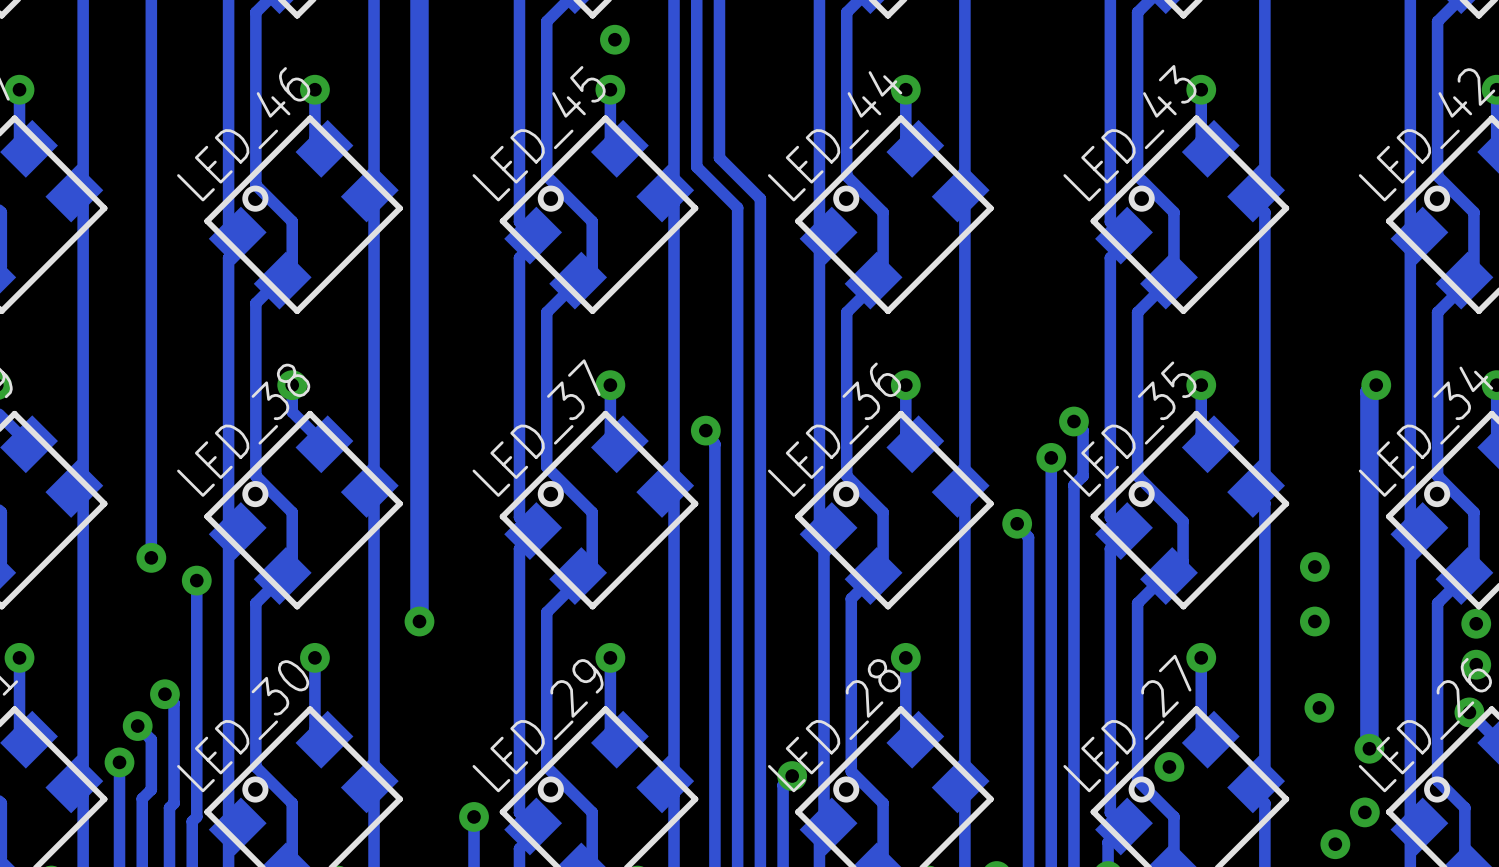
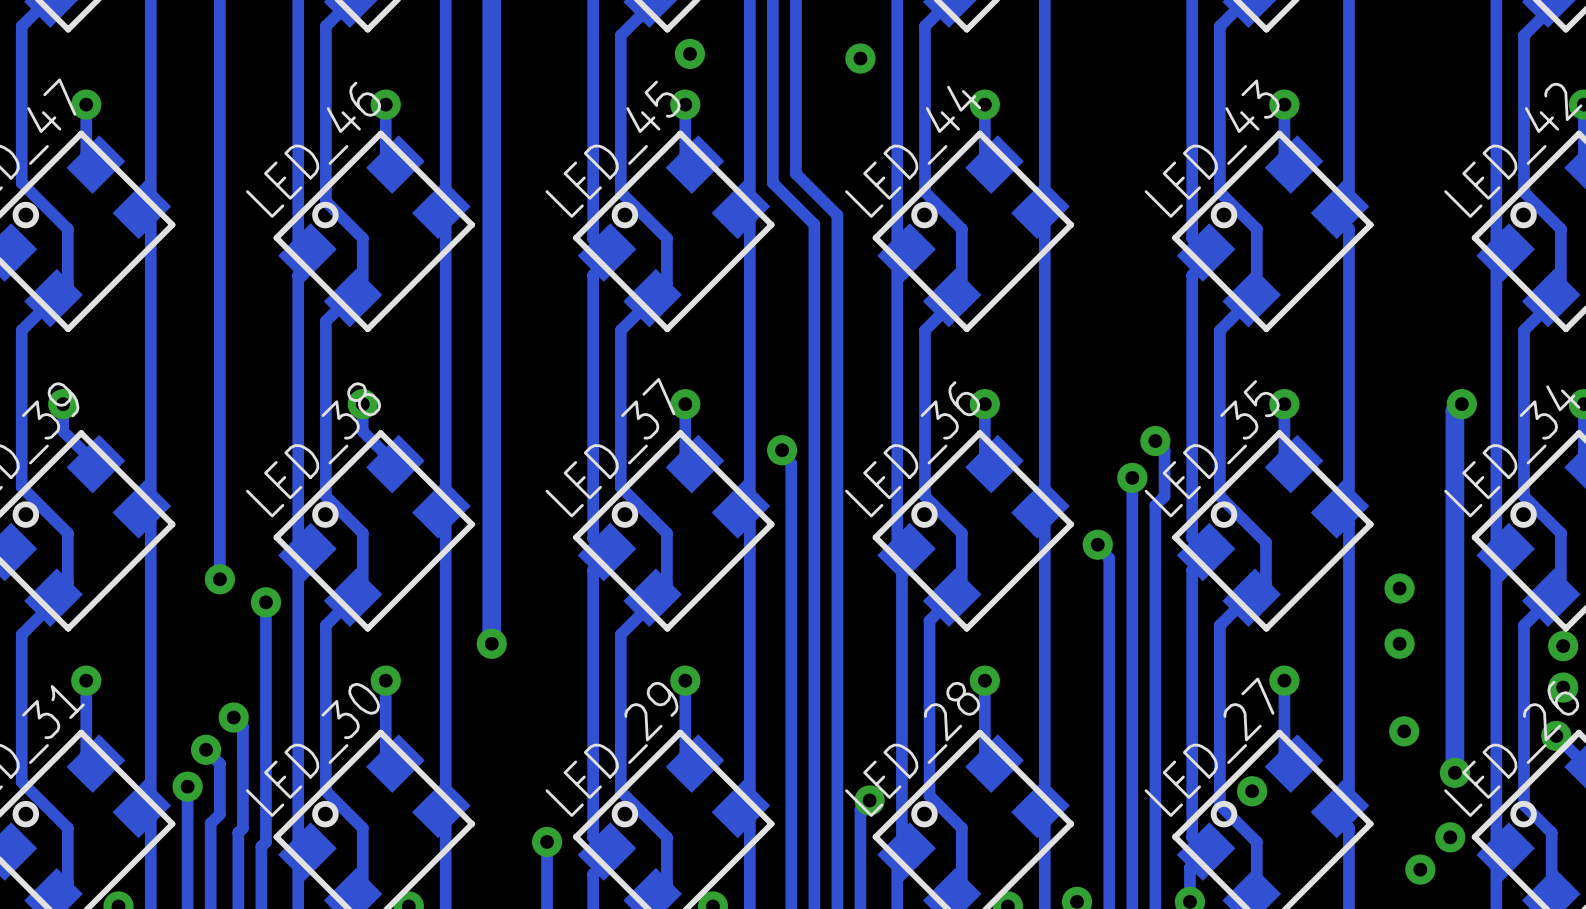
via: none -> (860, 58)

